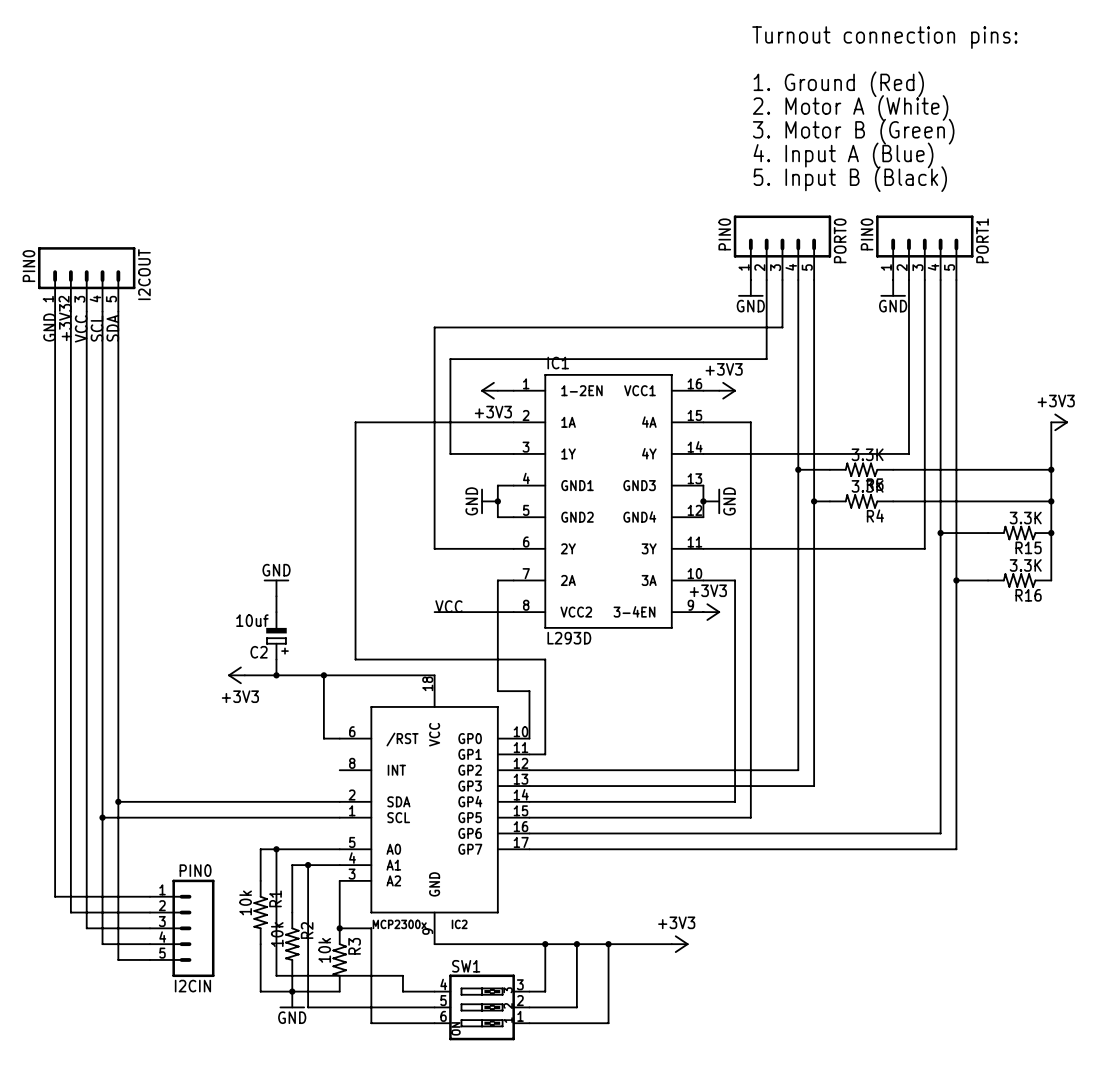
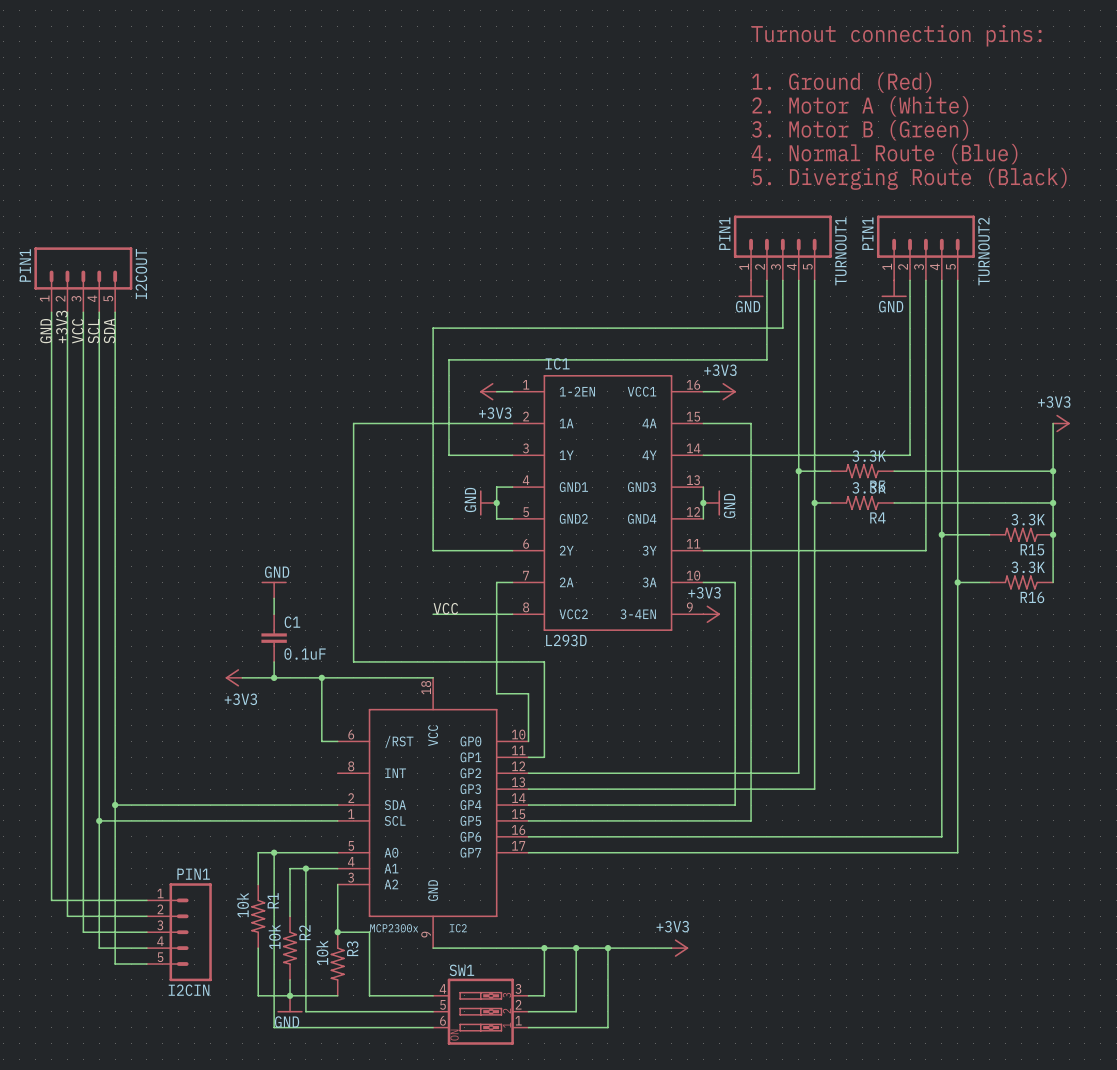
text: 4. Input A (Blue) (843, 155) -> 4. Normal Route (Blue) (884, 154)
text: 5. Input B (Black) (850, 179) -> 5. Diverging Route (Black) (909, 178)
PORT0 value: PIN0 (724, 234) -> PIN1 (724, 233)
PORT1 value: PIN0 (867, 234) -> PIN1 (867, 233)
PORT0 name: PORT0 (840, 240) -> TURNOUT1 (840, 251)
PORT1 name: PORT1 (982, 240) -> TURNOUT2 (983, 251)
I2COUT value: PIN0 (29, 266) -> PIN1 (25, 265)
C2: 10uf (276, 635) -> none
C1: none -> 0.1uF (274, 638)
I2CIN value: PIN0 (195, 870) -> PIN1 (193, 874)
wire: (276, 975) (402, 975) (402, 991) -> (274, 979) (274, 1027) (369, 1027)
wire: (371, 991) (371, 1023) -> (369, 995) (401, 995)

